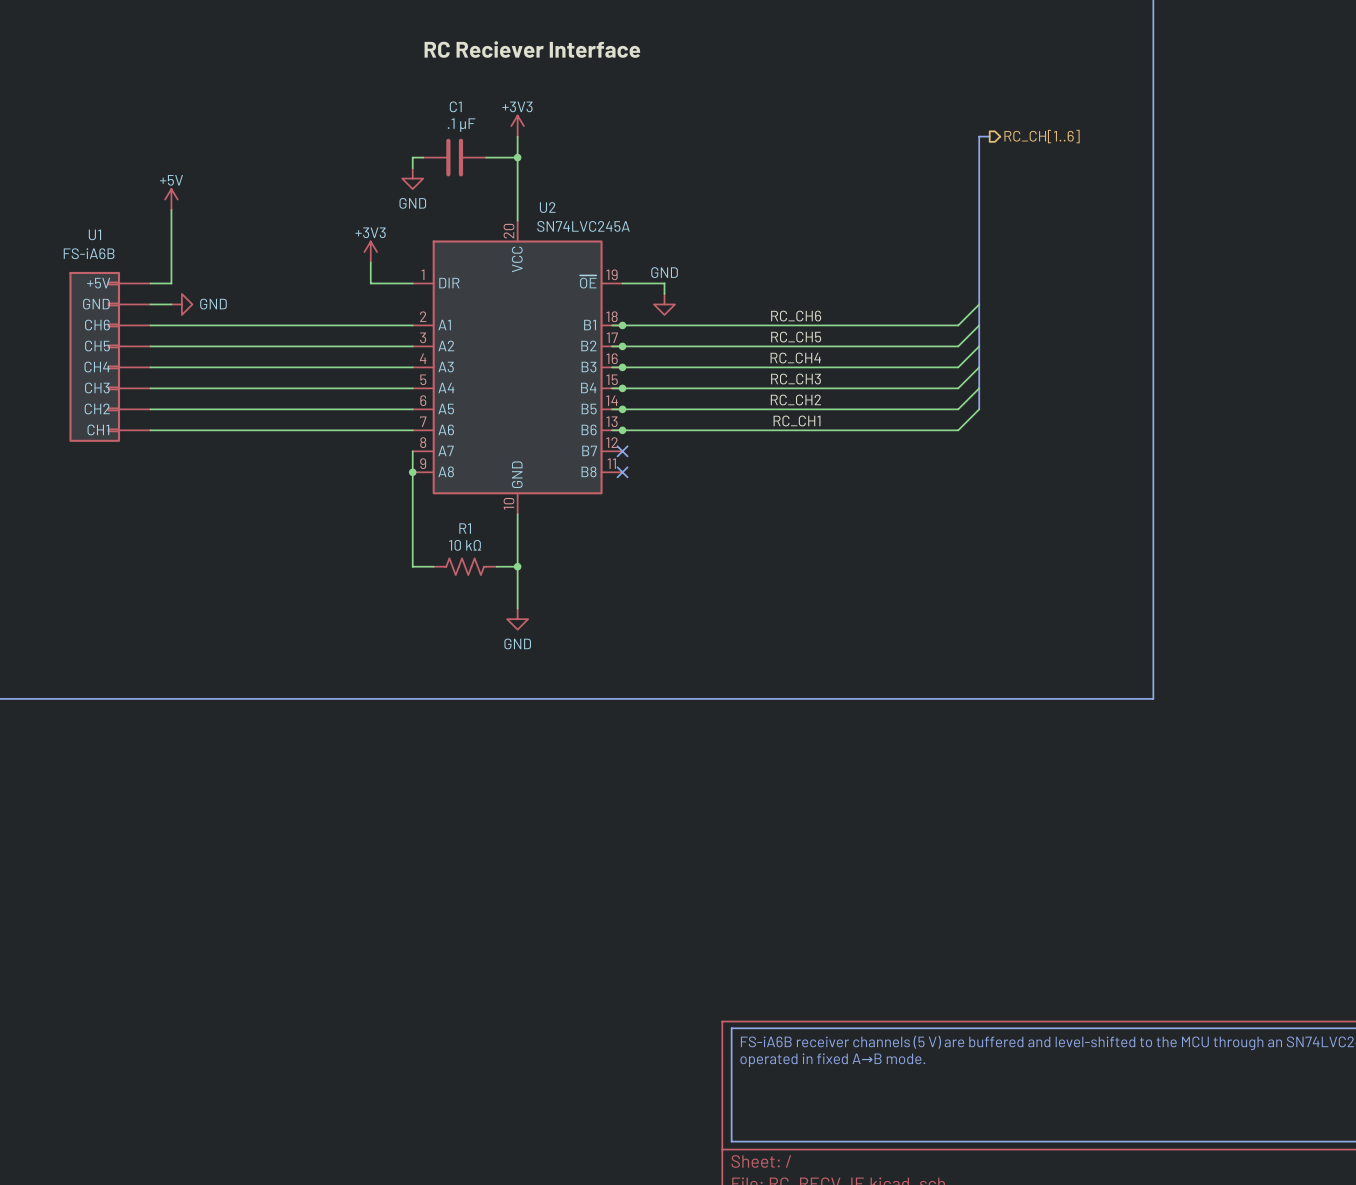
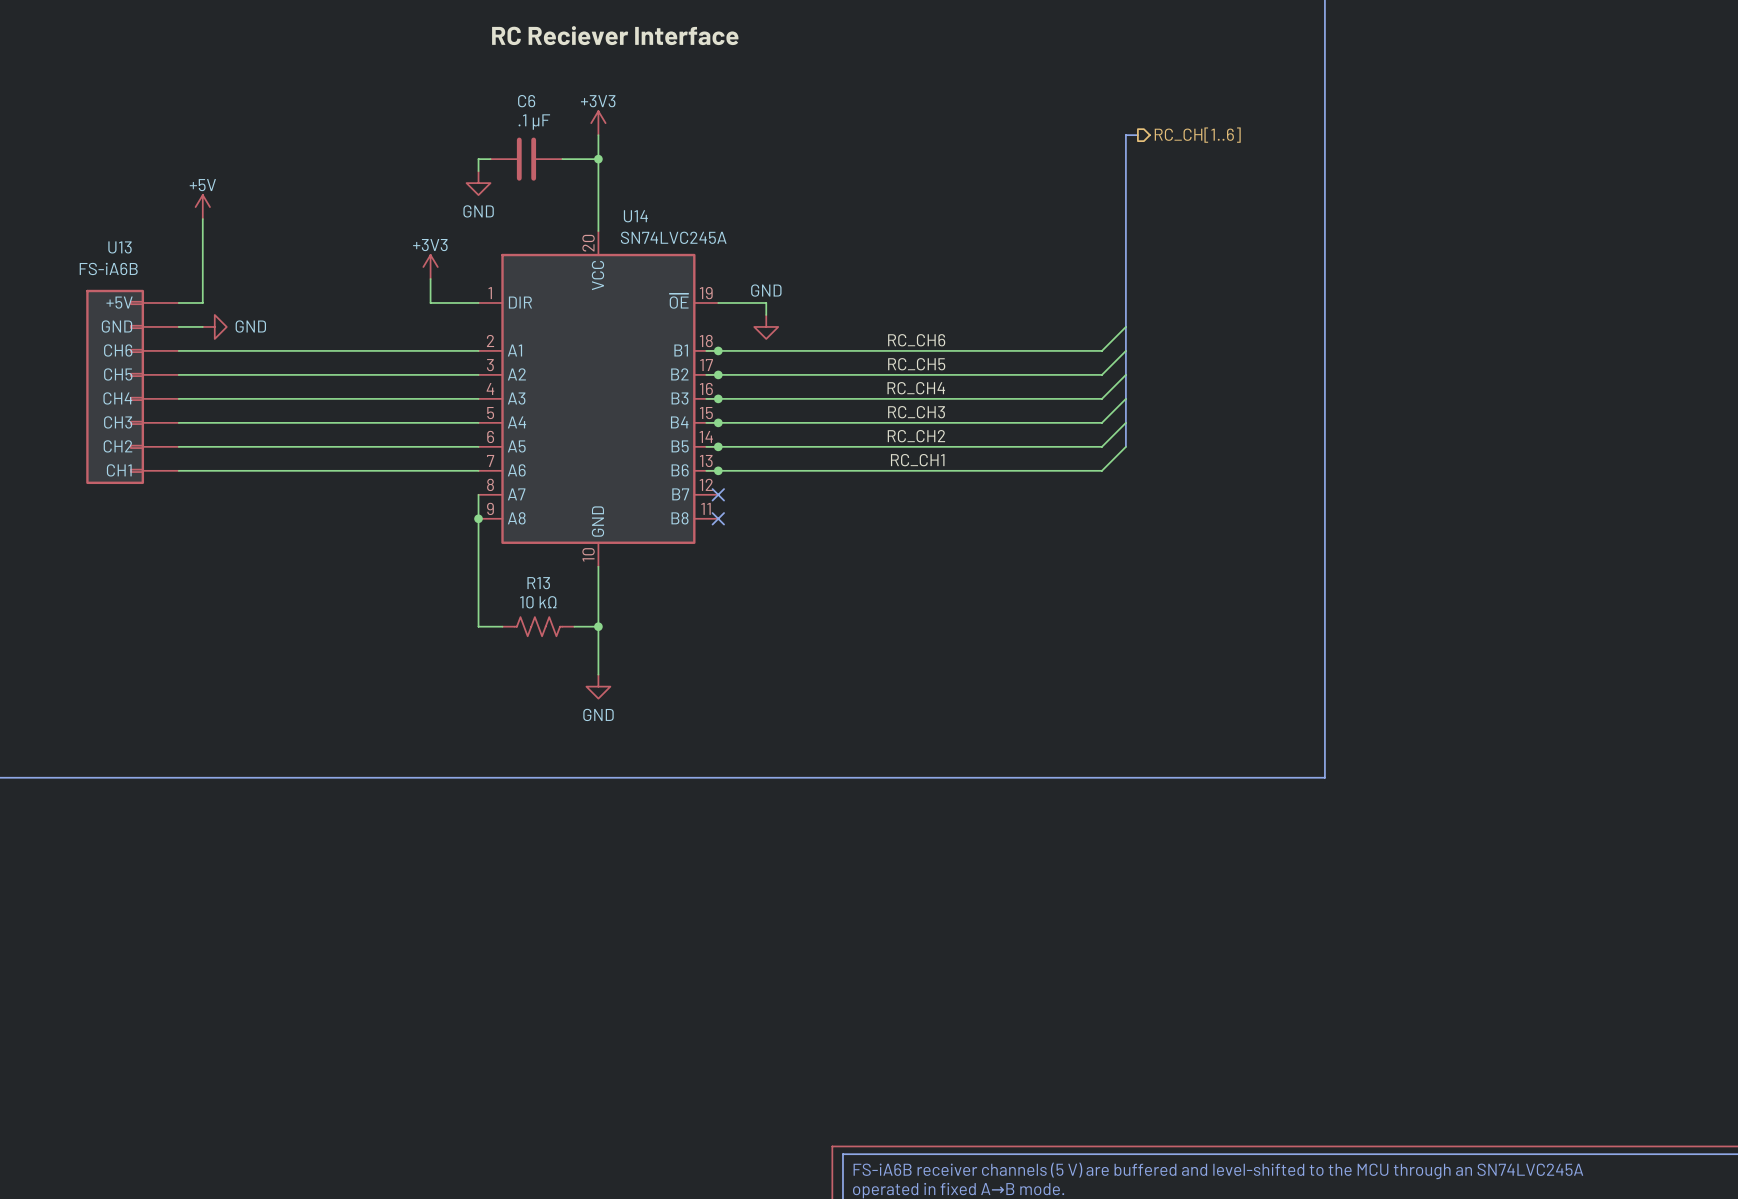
C1 name: C1 (455, 106) -> C6 (526, 101)
U2 name: U2 (547, 207) -> U14 (635, 216)
U1 name: U1 (94, 234) -> U13 (120, 247)
R1 name: R1 (465, 528) -> R13 (538, 583)

